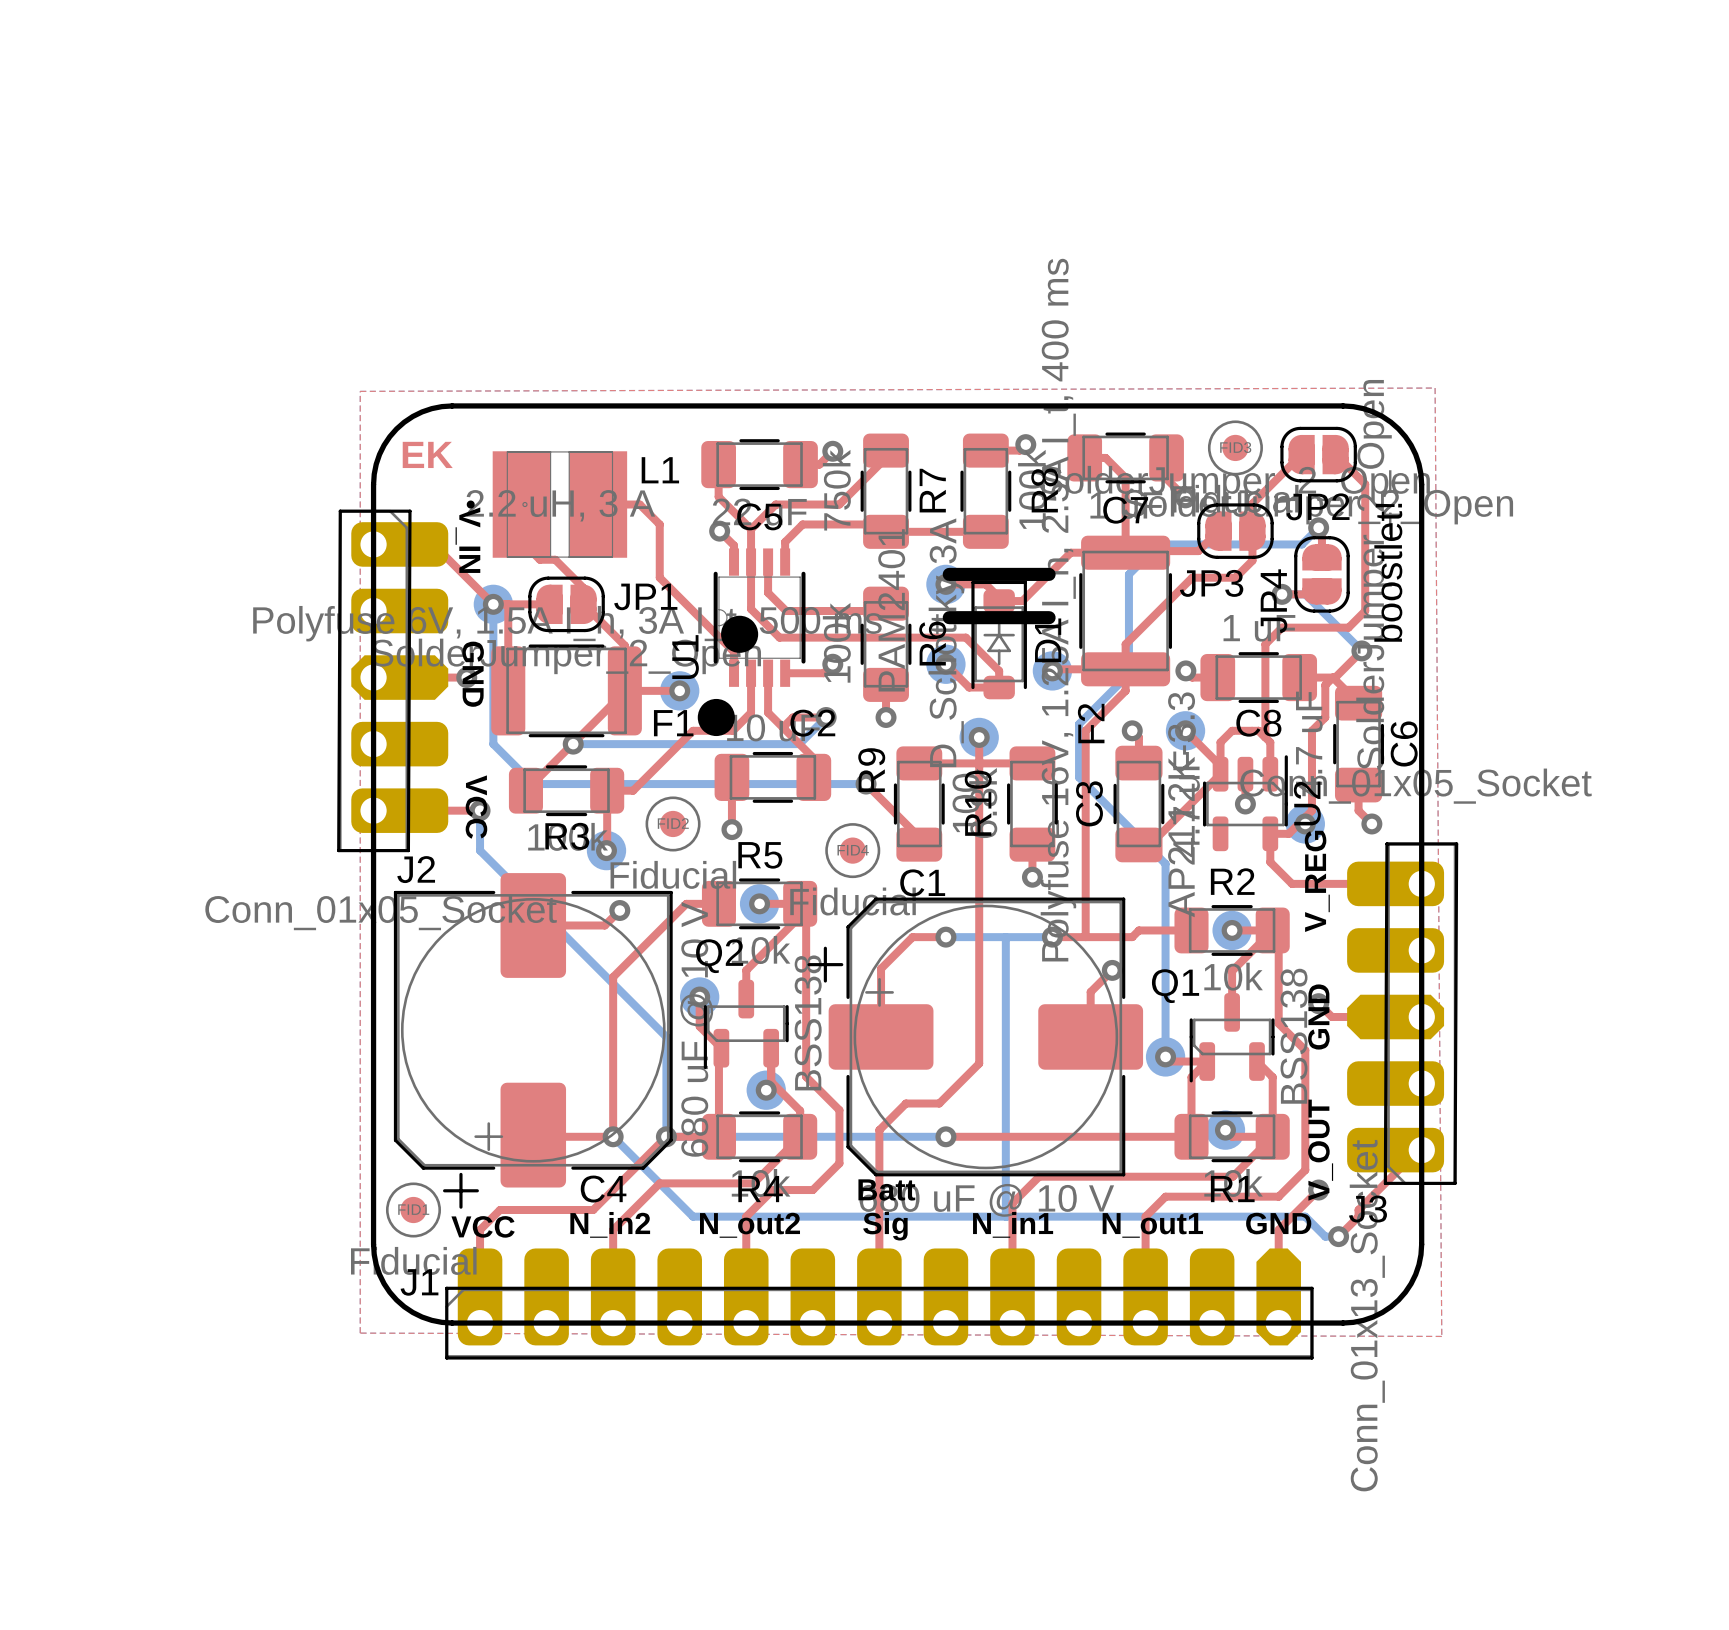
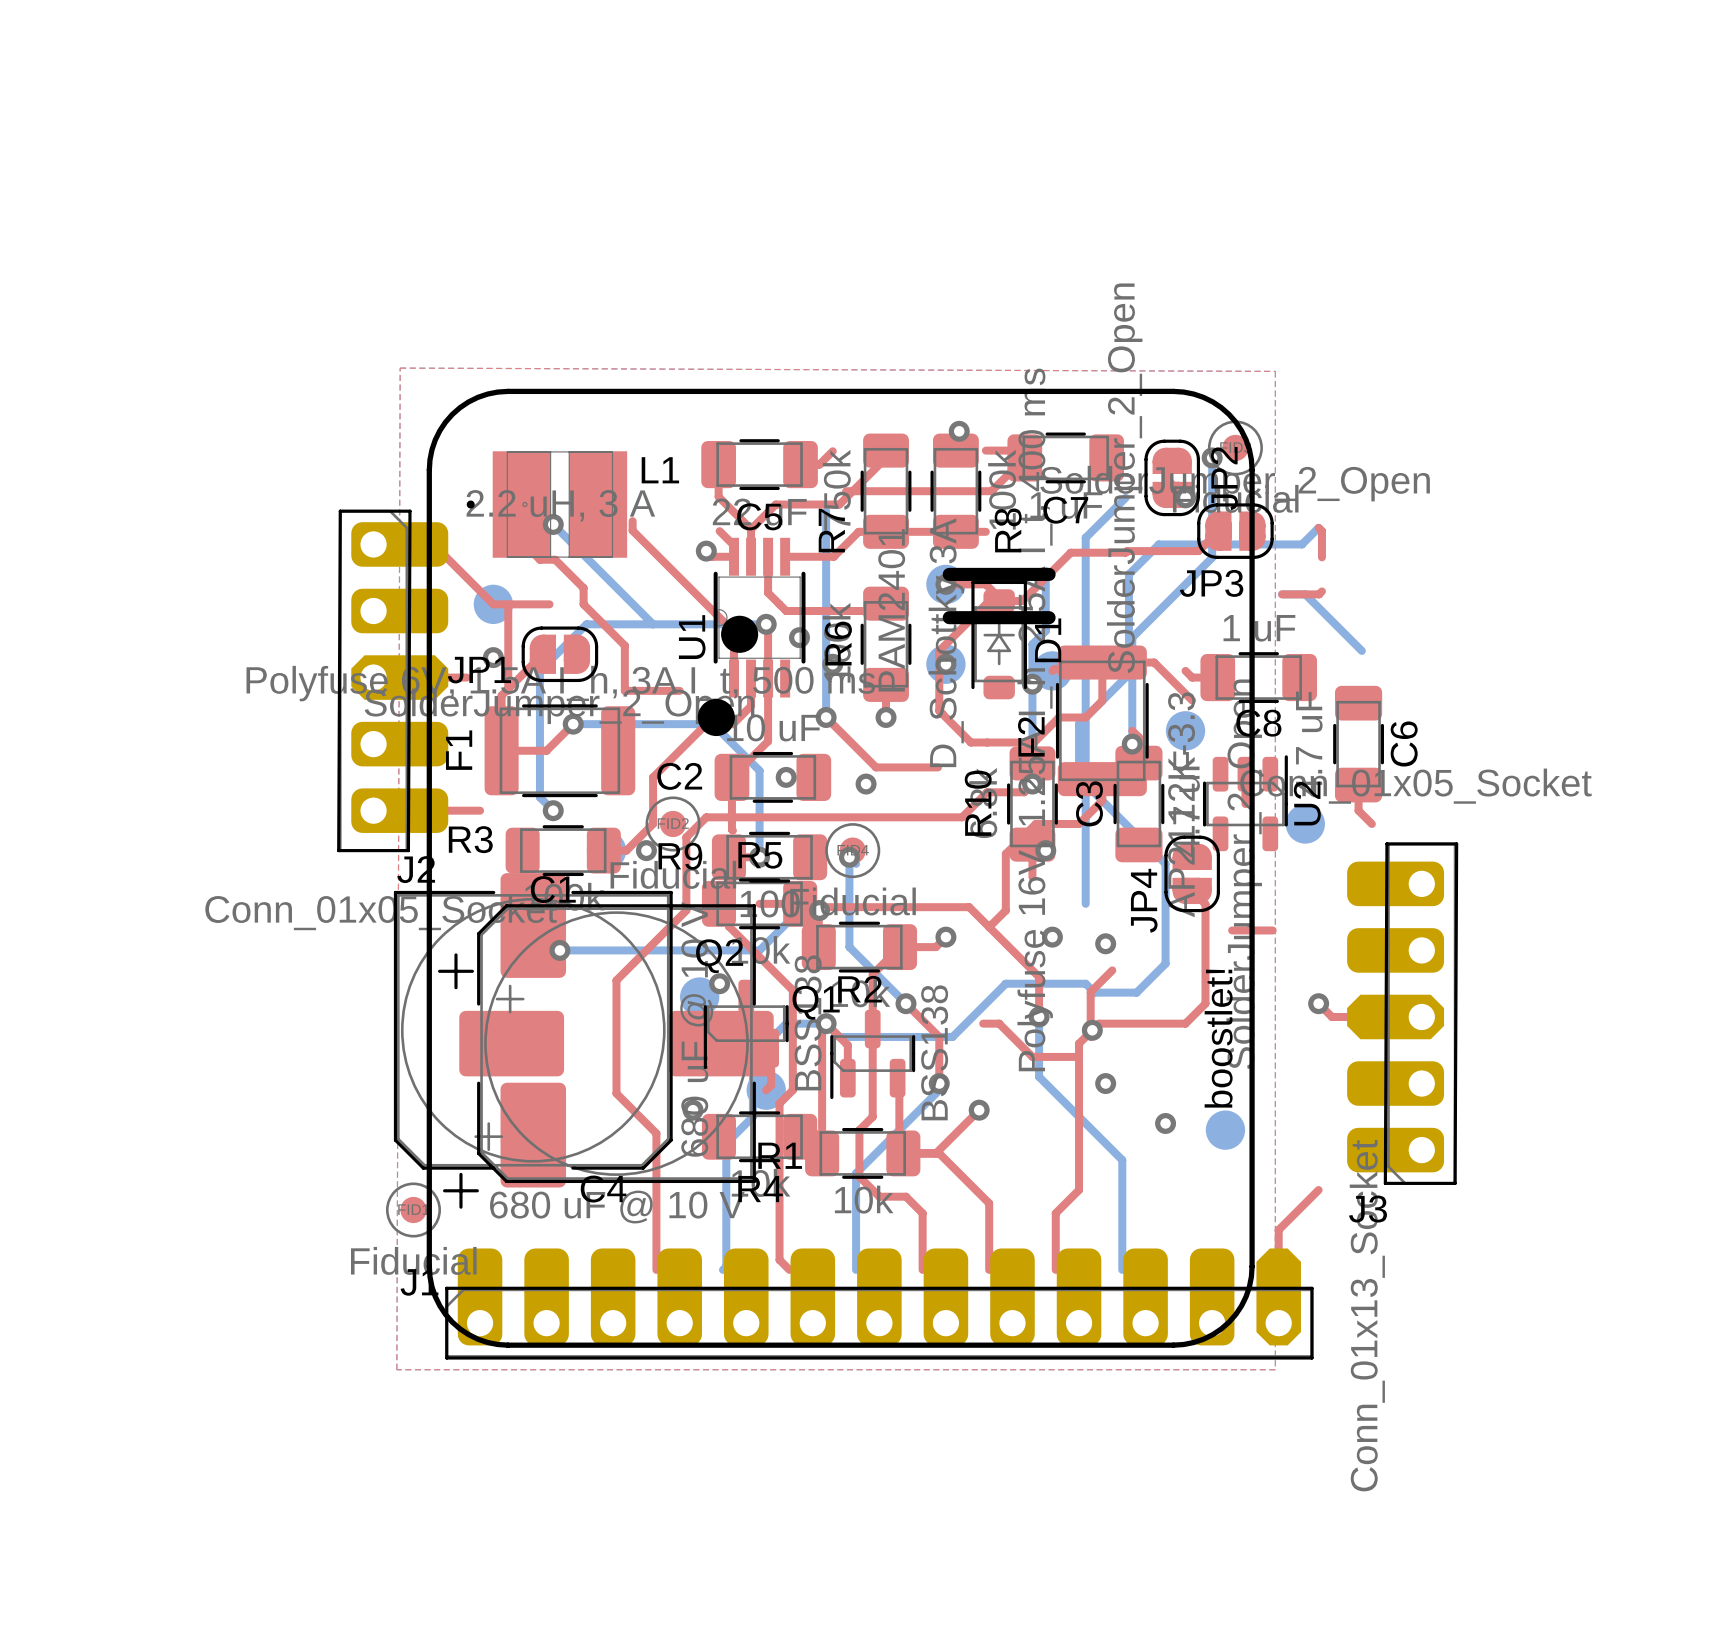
top zone outline: (1435, 388) (360, 391) (360, 1333) (1441, 1336) (1435, 388) -> (400, 368) (396, 1369) (1275, 1369) (1275, 371) (400, 368)
board edge: (452, 405) (1343, 405) (1373, 411) (1398, 428) (1415, 454) (1421, 484) (1421, 1244) (1415, 1274) (1398, 1300) (1373, 1317) (1343, 1323) (452, 1323) (422, 1317) (396, 1300) (379, 1274) (373, 1244) (373, 484) (379, 454) (396, 428) (422, 411) (452, 405) -> (507, 391) (487, 394) (460, 407) (439, 430) (429, 459) (429, 1266) (432, 1286) (445, 1314) (468, 1334) (487, 1342) (507, 1345) (1173, 1345) (1193, 1342) (1221, 1328) (1235, 1314) (1246, 1296) (1252, 1266) (1252, 470) (1249, 449) (1235, 422) (1212, 401) (1193, 394) (1173, 391) (507, 391)
via: none -> (959, 431)
via: (1025, 444) -> none
via: (832, 451) -> none
text: EK (427, 454) -> none
top track: (1301, 454) (1252, 503) (1252, 560) (1235, 577) (1192, 577) (1125, 644) (1125, 690) (1085, 730) (1085, 937) -> none
JP2 rotation: 0° (1318, 454) -> 90° clockwise (1172, 477)
JP2 position: (1318, 454) -> (1172, 477)
top track: (1335, 454) (1365, 484) (1365, 611) (1348, 627) (1282, 627) (1265, 644) (1265, 737) -> none
top track: none -> (1024, 457) (992, 491) (846, 491)
top track: (1084, 457) (1105, 457) (1125, 477) (1125, 552) -> none
C7 position: (1125, 457) -> (1065, 457)
bottom track: none -> (1212, 457) (1212, 557) (1132, 637) (1132, 744)
via: none -> (1212, 457)
R7 name position: R7 (932, 490) -> R7 (831, 530)
R8 name position: R8 (1044, 490) -> R8 (1008, 530)
R8 position: (985, 491) -> (955, 491)
bottom track: none -> (1125, 497) (1085, 537) (1085, 903)
top track: (598, 504) (639, 504) (659, 524) (659, 577) (734, 652) -> (632, 521) (632, 530) (734, 632) (734, 652)
JP2 name position: JP2 (1317, 506) -> JP2 (1224, 478)
bottom track: none -> (553, 524) (653, 624)
via: none -> (553, 524)
via: (1318, 527) -> none
via position: (719, 531) -> (706, 551)
top track: (886, 531) (878, 524) (802, 524) (785, 542) (785, 562) -> (886, 531) (858, 531) (833, 556) (785, 556)
text: V_IN (467, 540) -> none
U1 footprint: [713, 548, 806, 687] -> [713, 537, 806, 698]
top track: none -> (706, 551) (711, 556) (734, 556)
top track: (751, 556) (751, 609) (766, 624) -> none
bottom track: none -> (1045, 571) (1045, 630) (1032, 644) (1032, 784)
text position: boostlet! (1388, 572) -> boostlet! (1218, 1038)
JP4 position: (1321, 574) -> (1192, 873)
via: (1282, 594) -> none
JP1 name position: JP1 (645, 596) -> JP1 (479, 670)
top track: none -> (992, 597) (939, 650) (939, 710) (970, 742) (1034, 742) (1059, 717) (1085, 717) (1102, 700) (1102, 662) (1154, 662) (1192, 700)
bottom track: (493, 604) (493, 744) (533, 784) (866, 784) -> none
via: (493, 604) -> none
JP1 position: (566, 604) -> (559, 654)
F2 position: (1125, 611) -> (1102, 720)
bottom track: none -> (766, 624) (586, 624) (539, 670) (539, 797) (553, 810)
via: none -> (766, 624)
top track: (768, 626) (779, 637) (965, 637) (999, 670) (999, 687) (969, 687) (945, 664) -> (768, 626) (768, 673)
via: none -> (799, 637)
R6 name position: R6 (932, 643) -> R6 (838, 643)
top track: (1361, 650) (1335, 677) (1299, 677) -> none
via: (1361, 650) -> none
top track: none -> (542, 654) (501, 695) (501, 750) (546, 750) (573, 724)
via: none -> (493, 657)
U1 name position: U1 (685, 657) -> U1 (692, 637)
top track: (832, 664) (823, 673) (785, 673) -> none
via position: (1052, 670) -> (1032, 684)
via: (1185, 670) -> none
text: GND (473, 674) -> none
via: (466, 677) -> none
F1 position: (566, 690) -> (559, 750)
part: (679, 690) -> none
via: (679, 690) -> none
top track: (624, 691) (525, 790) -> none
top track: (1358, 703) (1332, 677) (1325, 685) (1325, 717) (1311, 730) (1311, 810) (1288, 833) (1270, 833) (1270, 862) (1292, 883) (1421, 883) -> none
top track: (751, 706) (751, 712) (732, 730) (693, 730) (633, 790) (607, 790) (606, 850) -> (751, 706) (732, 724) (706, 724) (653, 777) (653, 823) (626, 850) (603, 850)
top track: (768, 712) (813, 758) (813, 777) -> (768, 712) (768, 741) (731, 777)
top track: (826, 717) (792, 717) (782, 727) -> (826, 717) (876, 767) (938, 767)
bottom track: (826, 717) (799, 744) (573, 744) -> (826, 717) (826, 511)
F1 name rotation: 0° (673, 723) -> 90° counterclockwise (459, 750)
F1 name position: F1 (673, 723) -> F1 (459, 750)
C2 name position: C2 (812, 723) -> C2 (679, 776)
F2 name position: F2 (1091, 723) -> F2 (1031, 736)
bottom track: none -> (573, 724) (712, 724) (759, 770) (759, 857)
via position: (1132, 730) -> (1132, 744)
top track: (1185, 730) (1220, 765) -> none
via: (1185, 730) -> none
top track: (979, 737) (979, 1063) (939, 1103) (905, 1103) (879, 1130) (879, 1323) -> none
part: (979, 737) -> none
via: (979, 737) -> none
via position: (573, 744) -> (573, 724)
top track: (919, 763) (1032, 763) -> none
R9 name position: R9 (871, 770) -> R9 (680, 856)
top track: (1270, 774) (1270, 742) (1258, 730) (1232, 730) (1220, 742) (1220, 774) (1149, 844) (1138, 844) -> none
via: none -> (786, 777)
top track: none -> (1102, 779) (1102, 800) (1079, 823) (1035, 823) (1005, 853) (1005, 910) (989, 927)
top track: (866, 784) (919, 837) (919, 844) -> none
top track: none -> (1032, 784) (1024, 792) (987, 792) (962, 817) (706, 817) (686, 837) (686, 910) (616, 980) (616, 1093) (656, 1133) (656, 1269)
via: none -> (1032, 784)
R3 position: (566, 790) -> (563, 850)
R9 rotation: 0° (919, 804) -> 90° clockwise (769, 857)
R9 position: (919, 804) -> (769, 857)
via: (1245, 804) -> none
text: VCC (476, 807) -> none
bottom track: (480, 810) (480, 850) (666, 1036) (666, 1136) (945, 1136) -> none
via: (480, 810) -> none
via: none -> (553, 810)
via: (1305, 823) -> none
via: (1371, 823) -> none
via: (731, 829) -> none
R3 name position: R3 (567, 836) -> R3 (470, 839)
via: (606, 850) -> none
via: none -> (646, 850)
top track: none -> (759, 857) (728, 857) (728, 926) (792, 990) (792, 1090) (779, 1103) (779, 1259) (789, 1269)
via: none -> (759, 857)
via: none -> (849, 857)
bottom track: none -> (856, 863) (849, 857) (849, 947) (905, 1003)
via position: (1032, 877) -> (1045, 850)
R2 name position: R2 (1232, 881) -> R2 (860, 989)
text: V_REG (1317, 881) -> none
top track: none -> (1192, 890) (1205, 904) (1205, 1003) (1185, 1023) (1099, 1023) (1079, 1043) (1079, 1190) (1055, 1213) (1055, 1269)
top track: (718, 903) (686, 903) (613, 977) (613, 1136) (534, 1136) (533, 1135) -> none
part: (759, 903) -> none
via: (759, 903) -> none
top track: (619, 910) (604, 925) (533, 925) -> none
via: (619, 910) -> none
bottom track: none -> (819, 910) (799, 910) (759, 950) (559, 950)
via: none -> (819, 910)
top track: (1191, 930) (1138, 930) (1132, 937) (1052, 937) -> none
R2 position: (1232, 930) -> (859, 947)
part: (1232, 930) -> none
via: (1232, 930) -> none
top track: (945, 937) (912, 937) (881, 968) (881, 1036) -> none
bottom track: (945, 937) (1052, 937) -> none
bottom track: (1005, 937) (1005, 1216) -> none
top track: none -> (939, 943) (935, 947) (900, 947) (872, 974) (872, 1116) (859, 1130) (859, 1176) (879, 1196) (905, 1196) (922, 1213) (922, 1269)
top track: none -> (818, 947) (818, 911) (822, 907) (969, 907) (1039, 977) (1039, 1016)
via: none -> (559, 950)
bottom track: (1165, 963) (1165, 1056) -> (1165, 963) (1136, 992) (1094, 992) (1085, 983) (1005, 983) (952, 1036) (839, 1036) (826, 1023) (786, 1023) (752, 1056) (752, 1116) (726, 1143) (726, 1266) (722, 1269)
via position: (1112, 970) -> (1105, 943)
top track: (699, 997) (699, 1026) (721, 1048) (718, 1050) (718, 1136) (666, 1136) (593, 1210) (500, 1210) (480, 1229) (480, 1323) -> none
via position: (699, 997) -> (719, 983)
top track: (746, 999) (746, 970) (800, 916) (800, 903) (806, 909) (806, 1076) (839, 1110) (839, 1163) (812, 1190) (772, 1190) (746, 1216) (746, 1323) -> none
top track: none -> (905, 1003) (939, 1036) (939, 1083)
via: none -> (905, 1003)
top track: (1232, 1012) (1232, 971) (1272, 930) (1278, 936) (1278, 1023) (1305, 1050) (1305, 1170) (1278, 1196) (1165, 1196) (1145, 1216) (1145, 1323) -> none
bottom track: none -> (1039, 1016) (1039, 1076) (1122, 1160) (1122, 1269)
via: none -> (1039, 1016)
text: GND (1318, 1017) -> none
via: none -> (826, 1023)
top track: none -> (983, 1023) (999, 1023) (1032, 1056) (1079, 1056)
via: none -> (1092, 1030)
C1 position: (975, 1036) -> (605, 1043)
Q1 position: (1232, 1037) -> (872, 1054)
top track: (1165, 1056) (1170, 1061) (1207, 1061) (1191, 1077) (1191, 1136) (945, 1136) -> none
part: (1165, 1056) -> none
via: (1165, 1056) -> none
top track: (1257, 1061) (1272, 1077) (1272, 1136) -> none
top track: none -> (847, 1078) (847, 1045) (826, 1023) (822, 1027) (822, 1153)
top track: none -> (897, 1078) (899, 1079) (899, 1149) (903, 1153) (939, 1153) (989, 1203) (989, 1269)
top track: (771, 1081) (800, 1110) (800, 1136) (753, 1183) (659, 1183) (613, 1229) (613, 1323) -> none
bottom track: none -> (939, 1083) (939, 1090) (856, 1173) (856, 1269)
via: none -> (939, 1083)
via: none -> (1105, 1083)
via: (766, 1090) -> none
top track: none -> (979, 1110) (935, 1153)
via: none -> (979, 1110)
via: none -> (1165, 1123)
top track: (1225, 1130) (1232, 1136) (1272, 1136) -> none
via: (1225, 1130) -> none
bottom track: (613, 1136) (693, 1216) (1305, 1216) (1325, 1236) (1338, 1236) -> none
via: (613, 1136) -> none
via position: (666, 1136) -> (693, 1110)
via: (945, 1136) -> none
R1 position: (1232, 1136) -> (862, 1153)
top track: (1272, 1136) (1232, 1176) (1039, 1176) (1012, 1203) (1012, 1323) -> none
text: V_OUT (1320, 1150) -> none
top track: (1421, 1150) (1418, 1150) (1358, 1210) (1358, 1216) (1338, 1236) -> none
text: Batt (886, 1189) -> none
R1 name position: R1 (1232, 1189) -> R1 (780, 1155)
via: (1318, 1190) -> none
text: GND (1278, 1223) -> none
text: N_in2 (610, 1224) -> none
text: N_in1 (1013, 1224) -> none
text: N_out2 (750, 1225) -> none
text: N_out1 (1152, 1225) -> none
text: VCC (483, 1226) -> none
text: Sig (885, 1226) -> none
via: (1338, 1236) -> none

